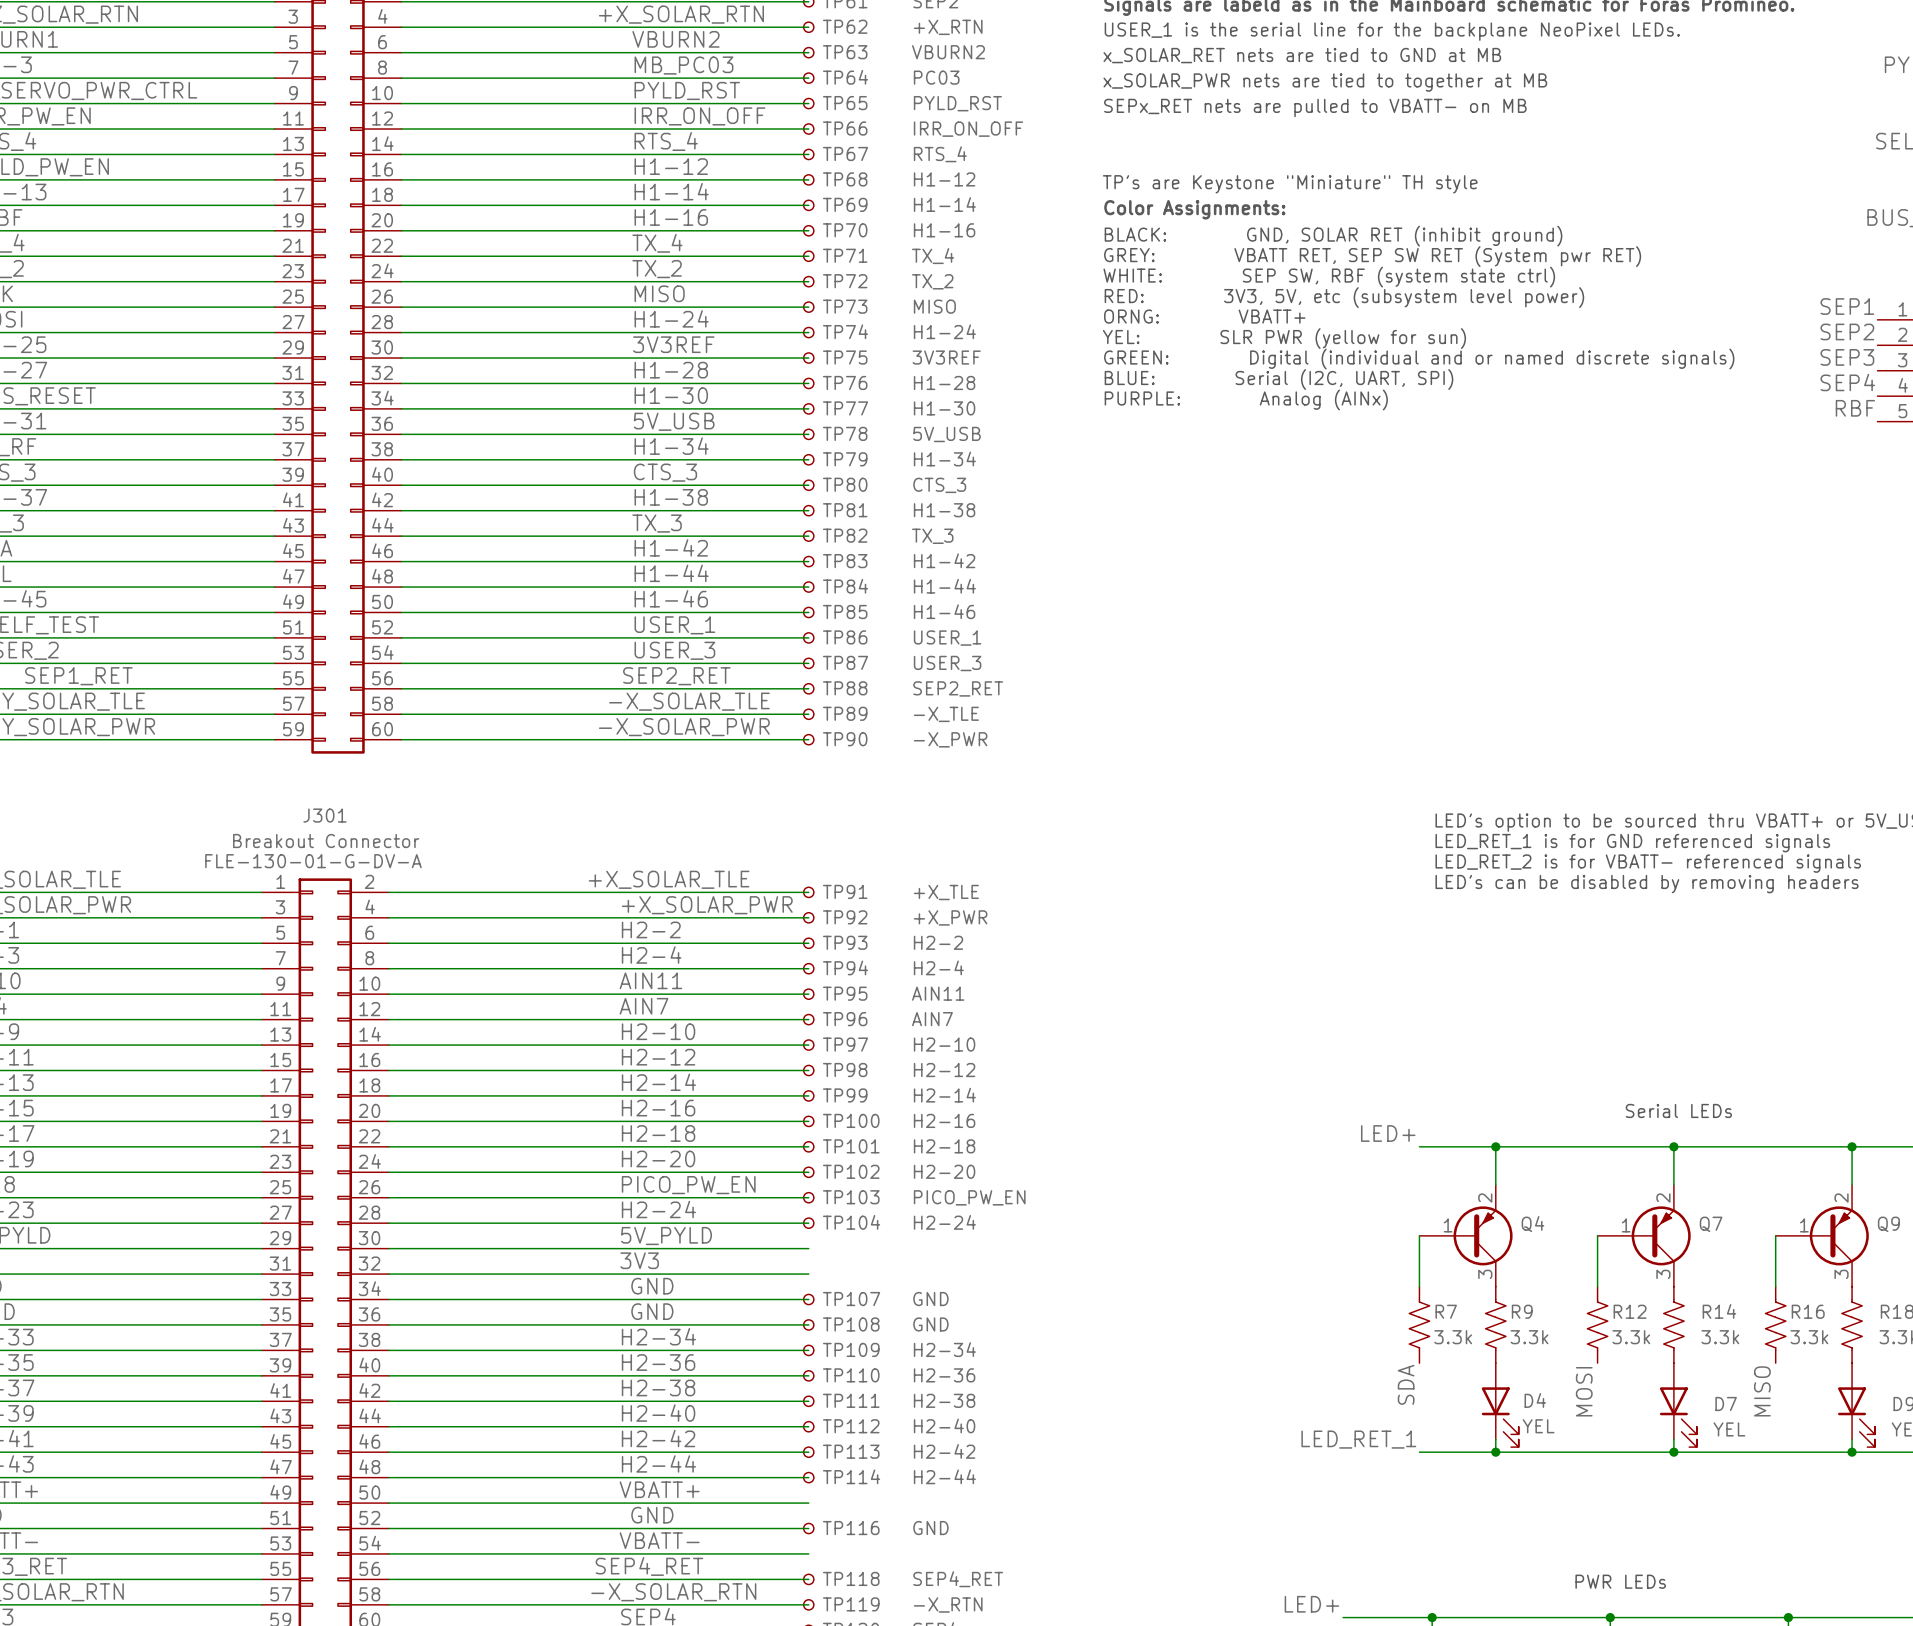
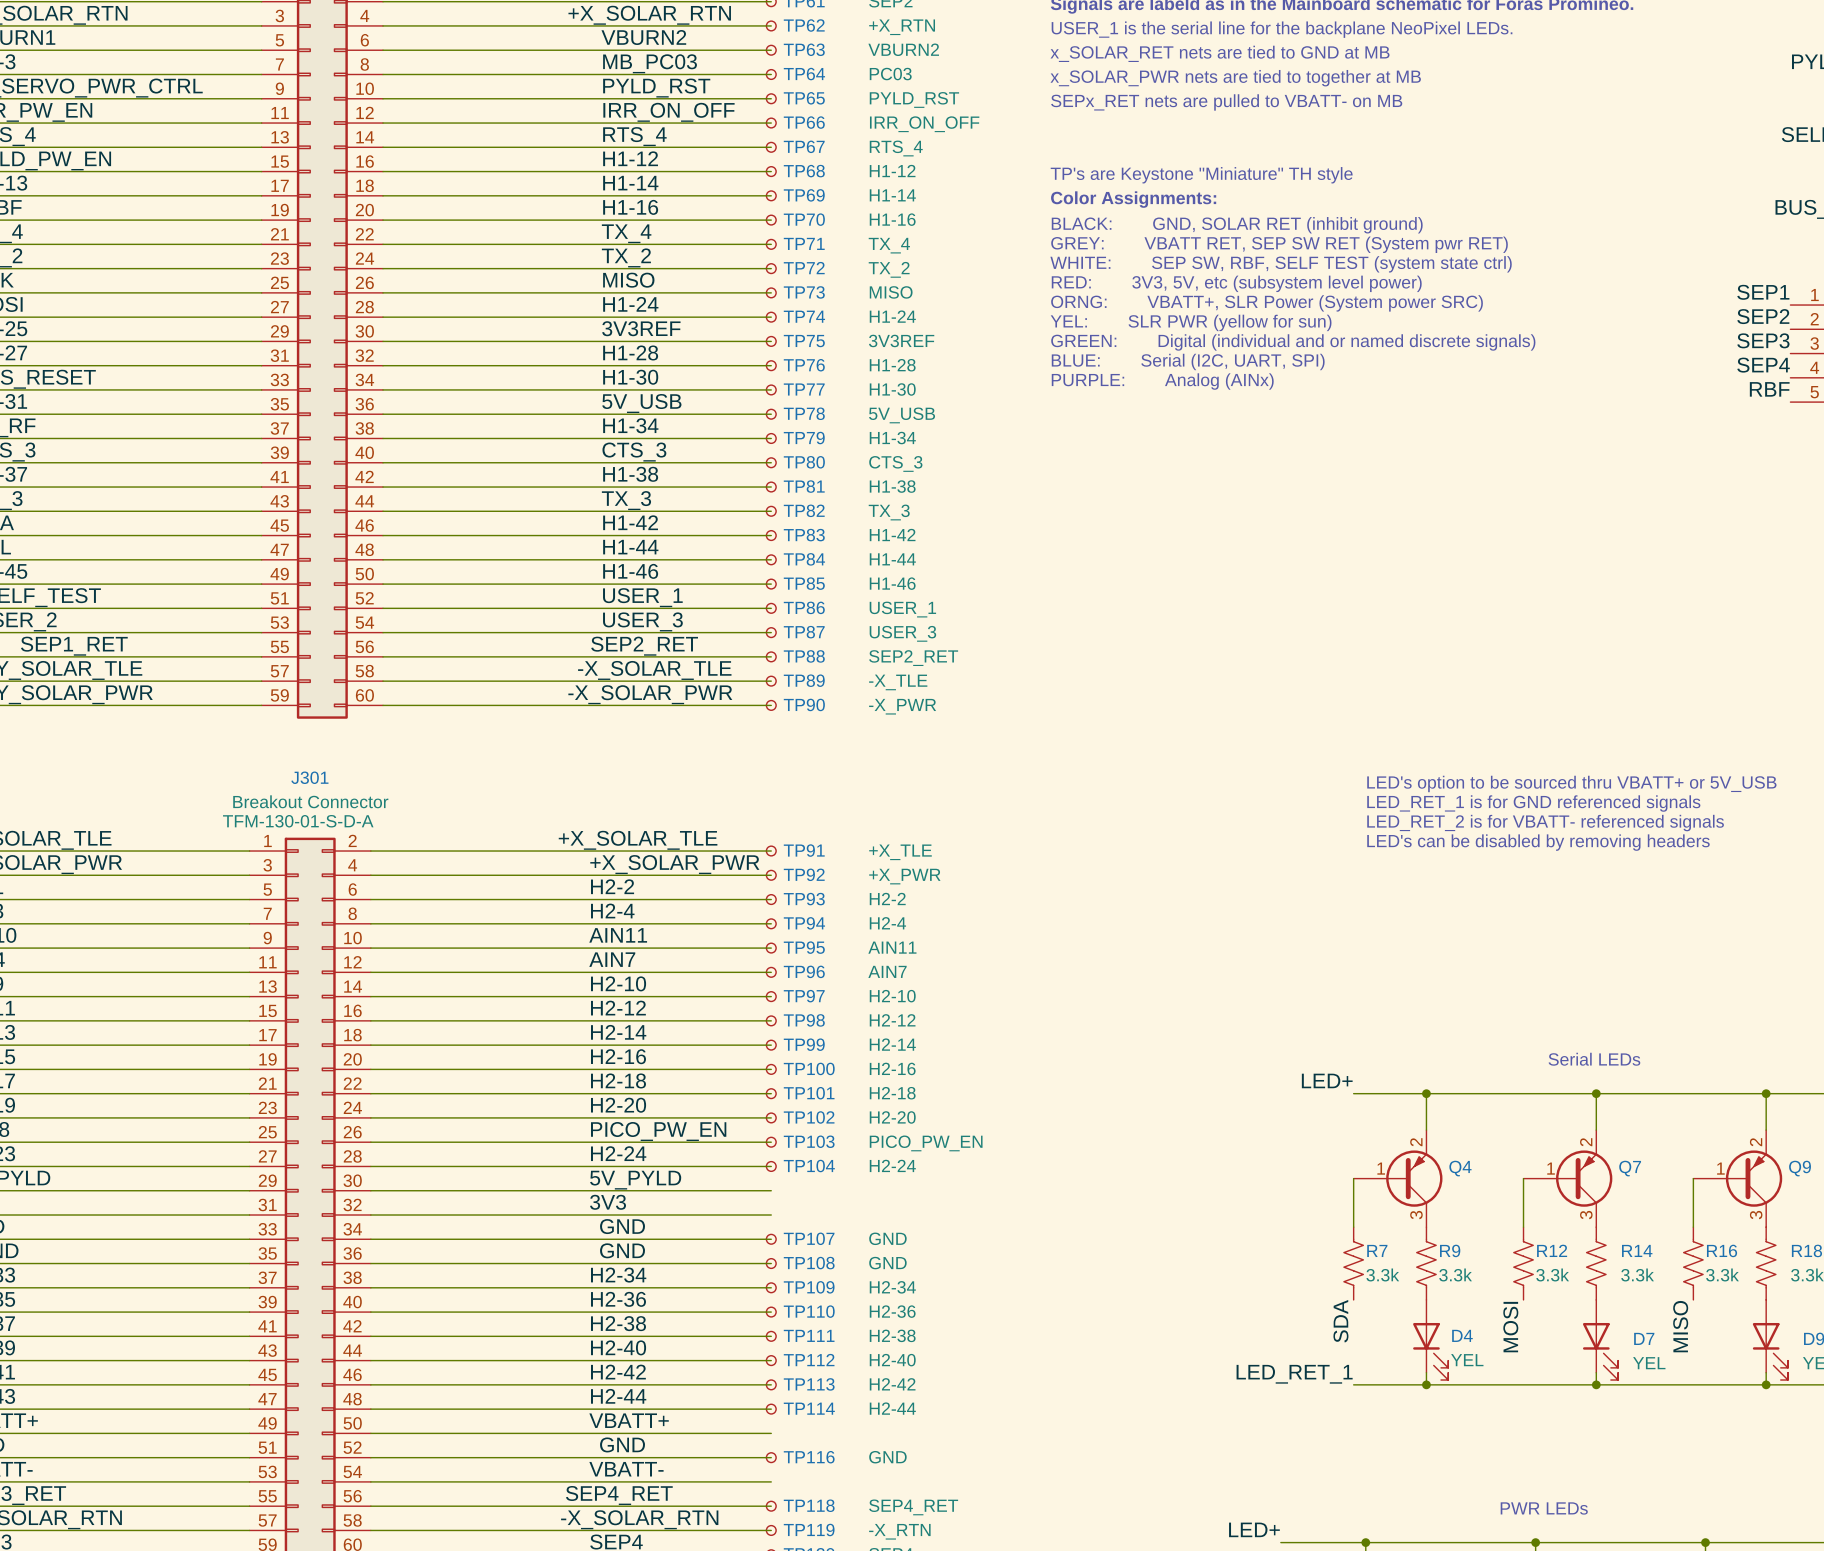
text: WHITE: SEP SW, RBF (system state ctrl) (1329, 277) -> WHITE: SEP SW, RBF, SELF TEST (system state ctrl) (1281, 264)
text: ORNG: VBATT+ (1204, 316) -> ORNG: VBATT+, SLR Power (System power SRC) (1267, 303)
J301 text: FLE-130-01-G-DV-A (313, 861) -> TFM-130-01-S-D-A (298, 821)

